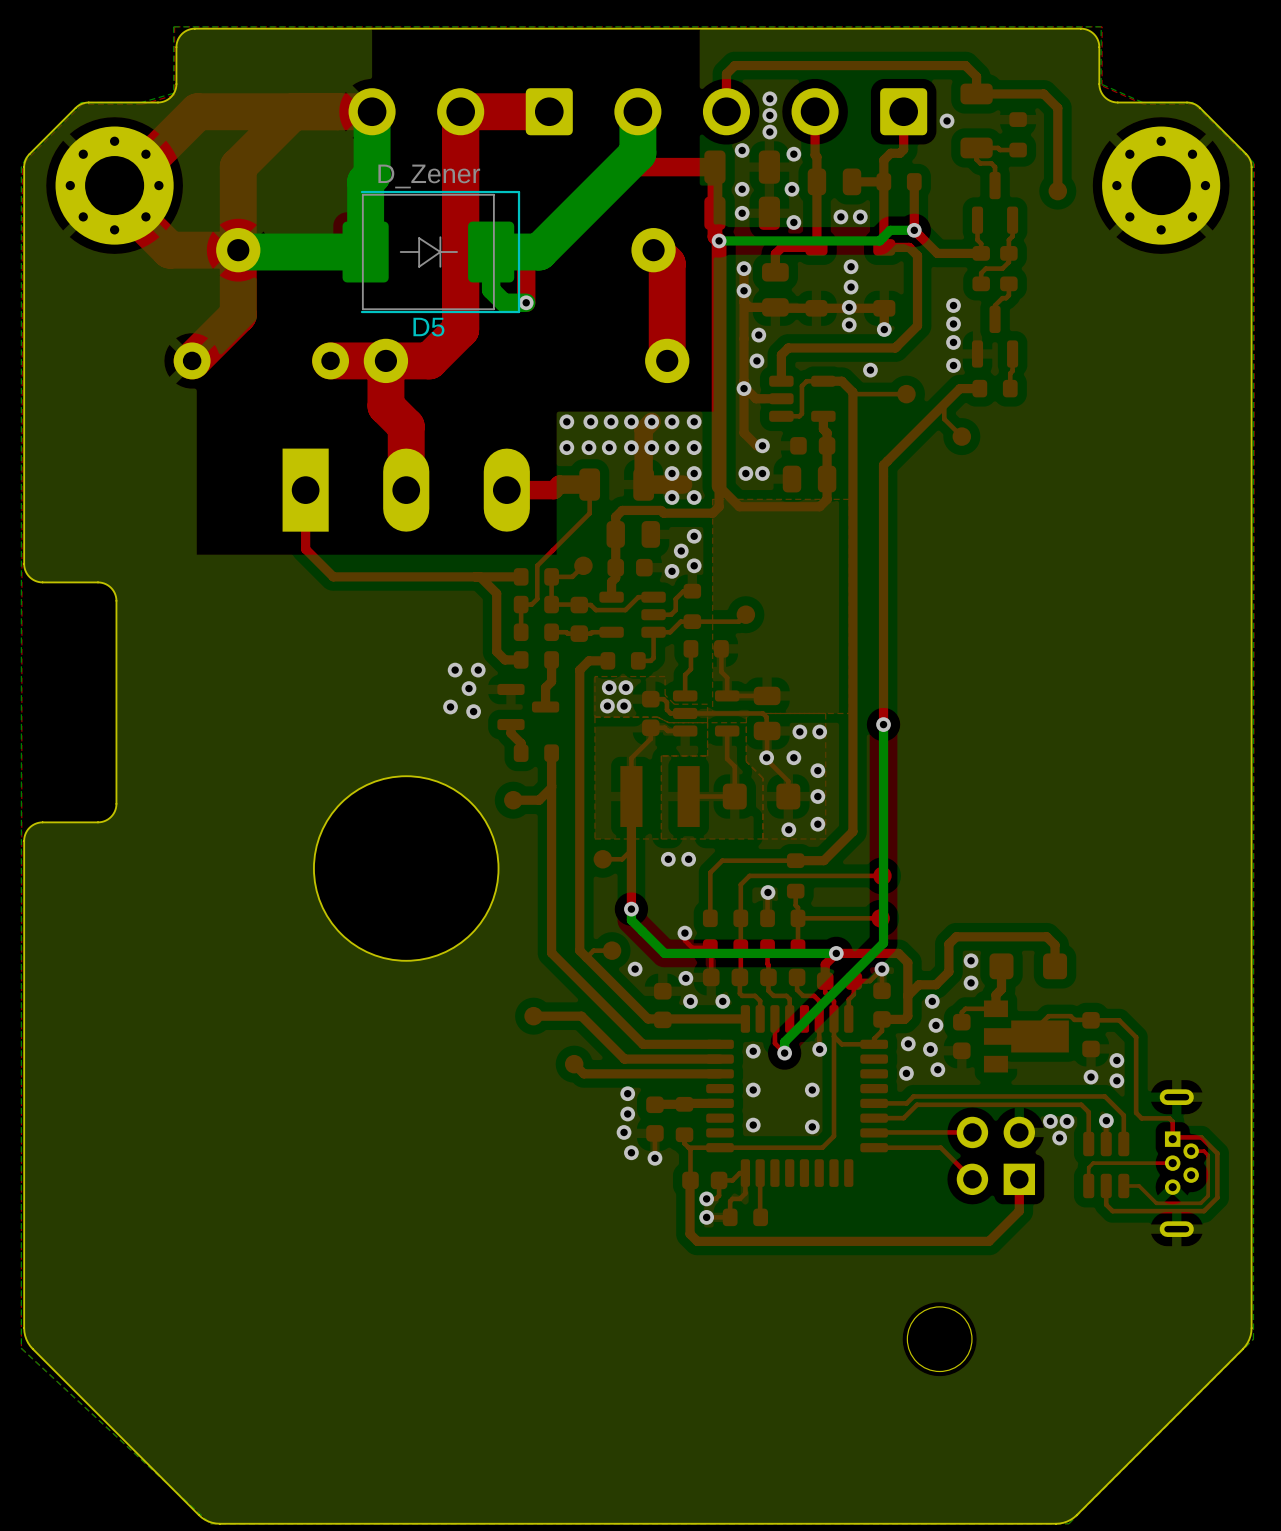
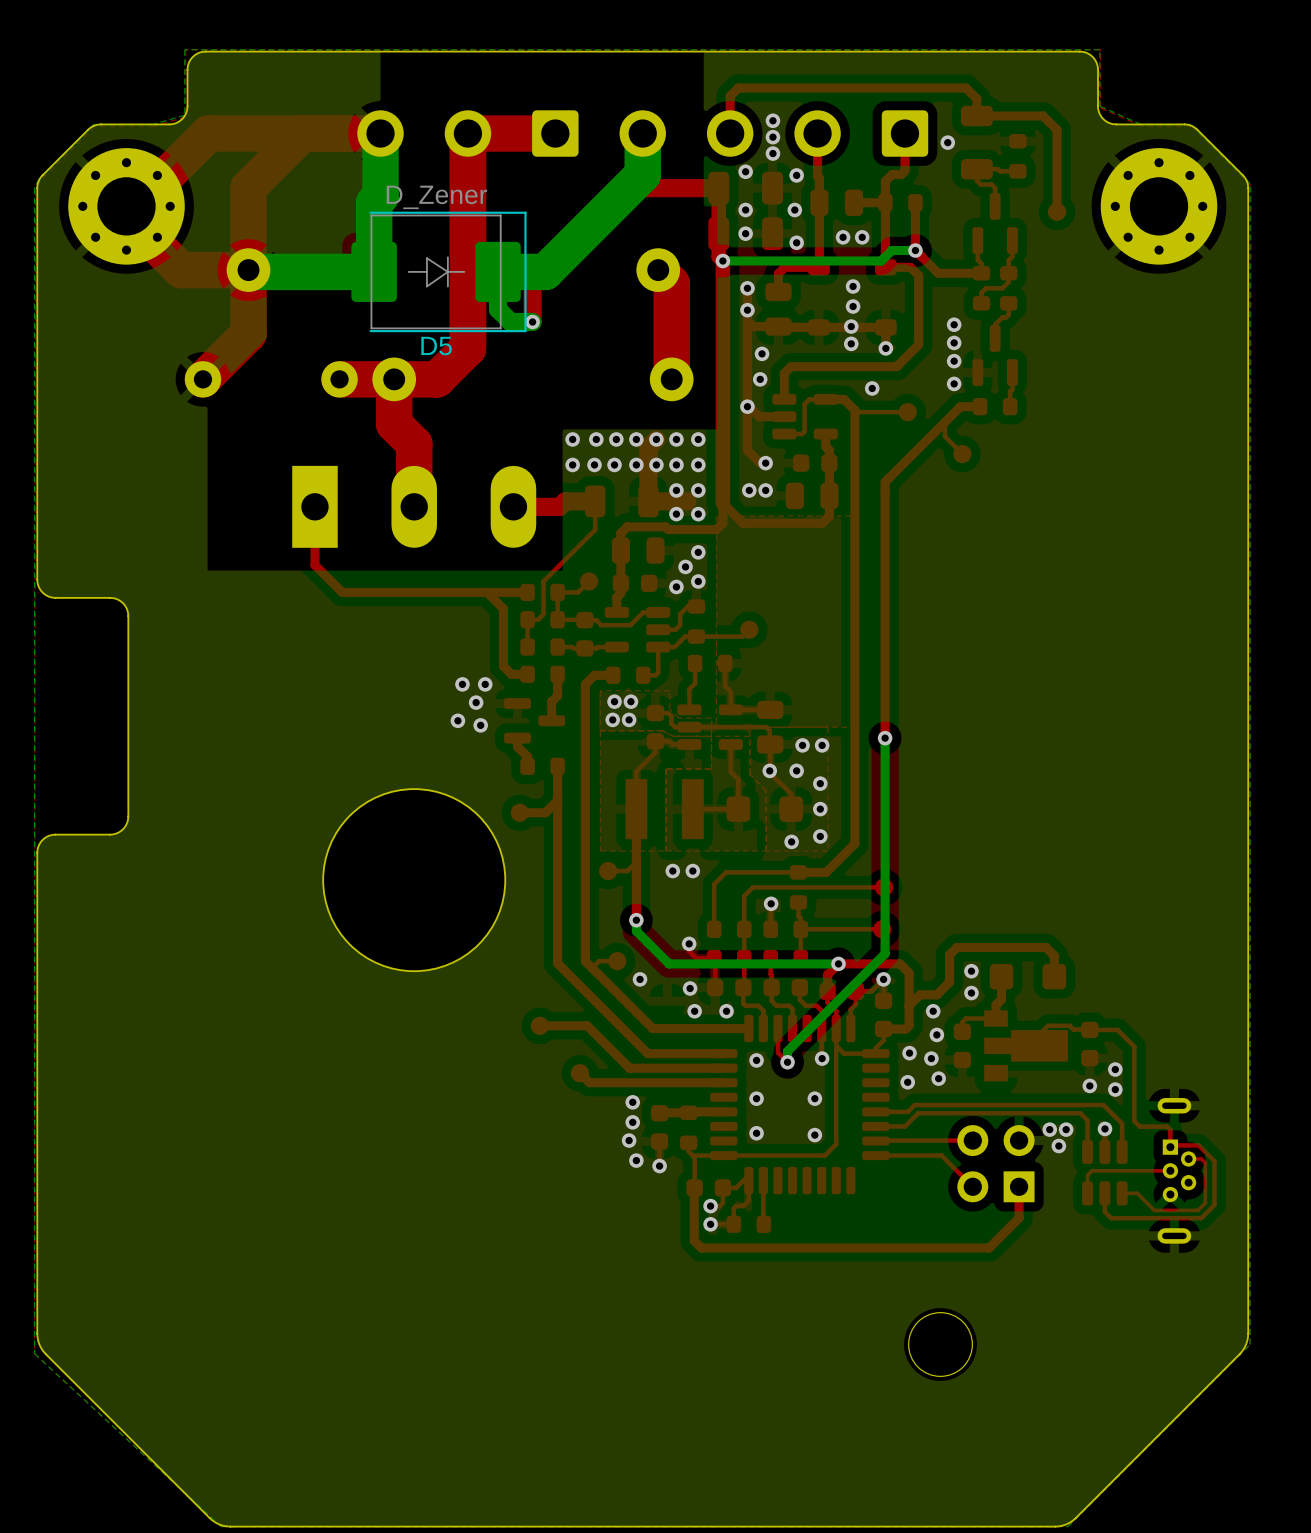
part: (662, 1005) -> none

